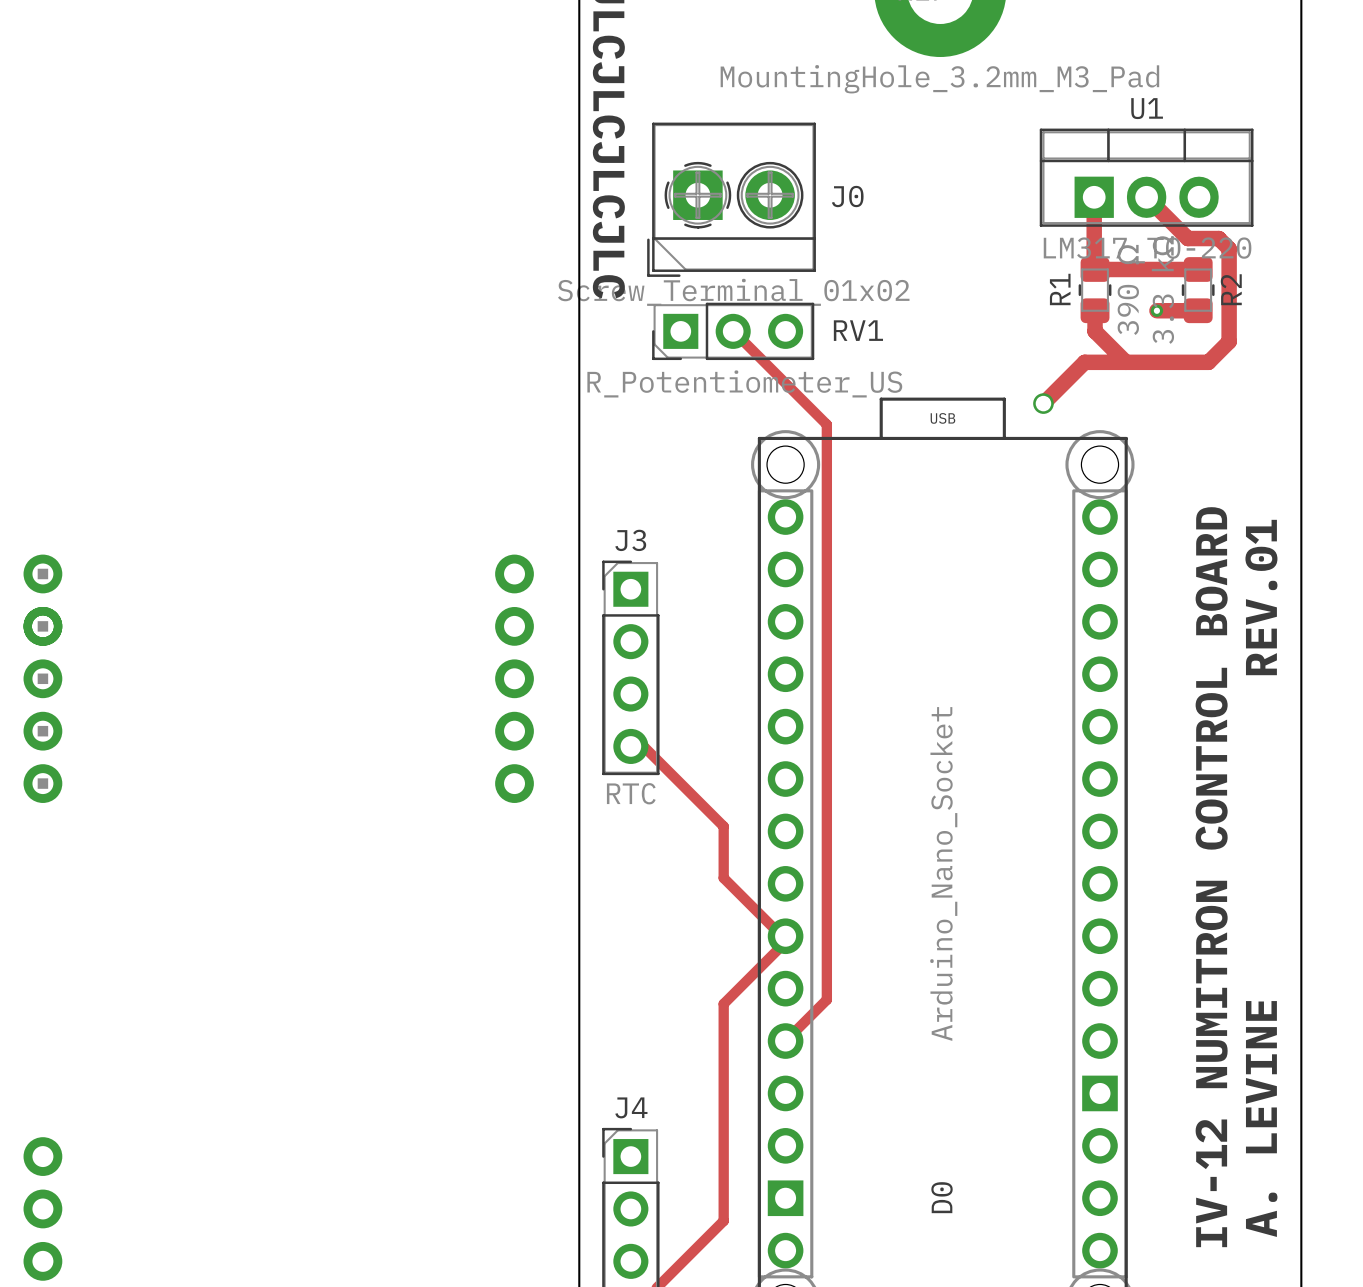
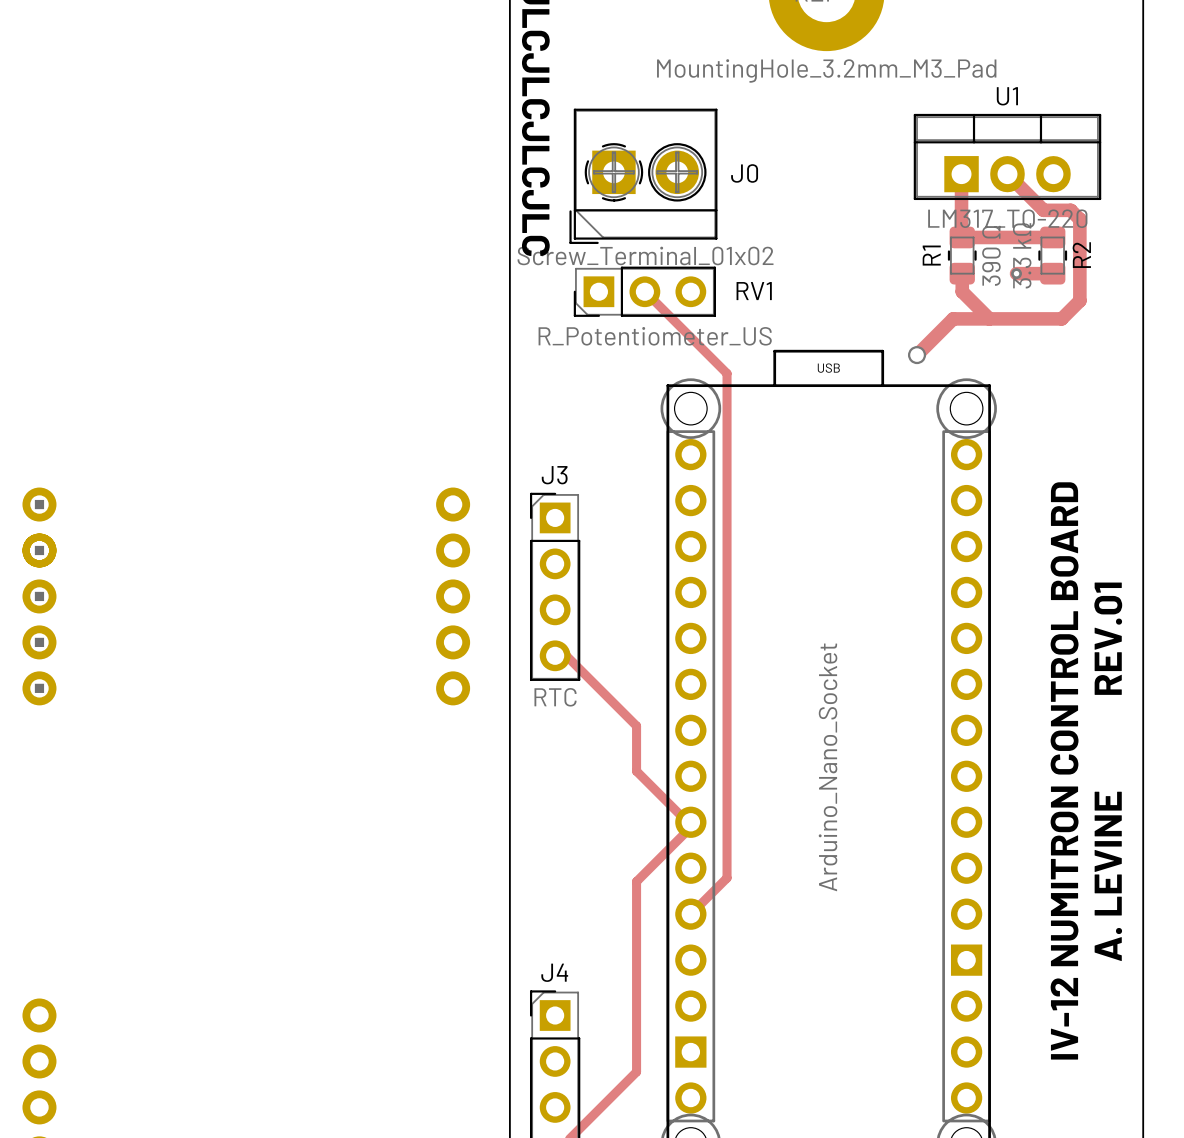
part text: D0 (942, 1197) -> none

